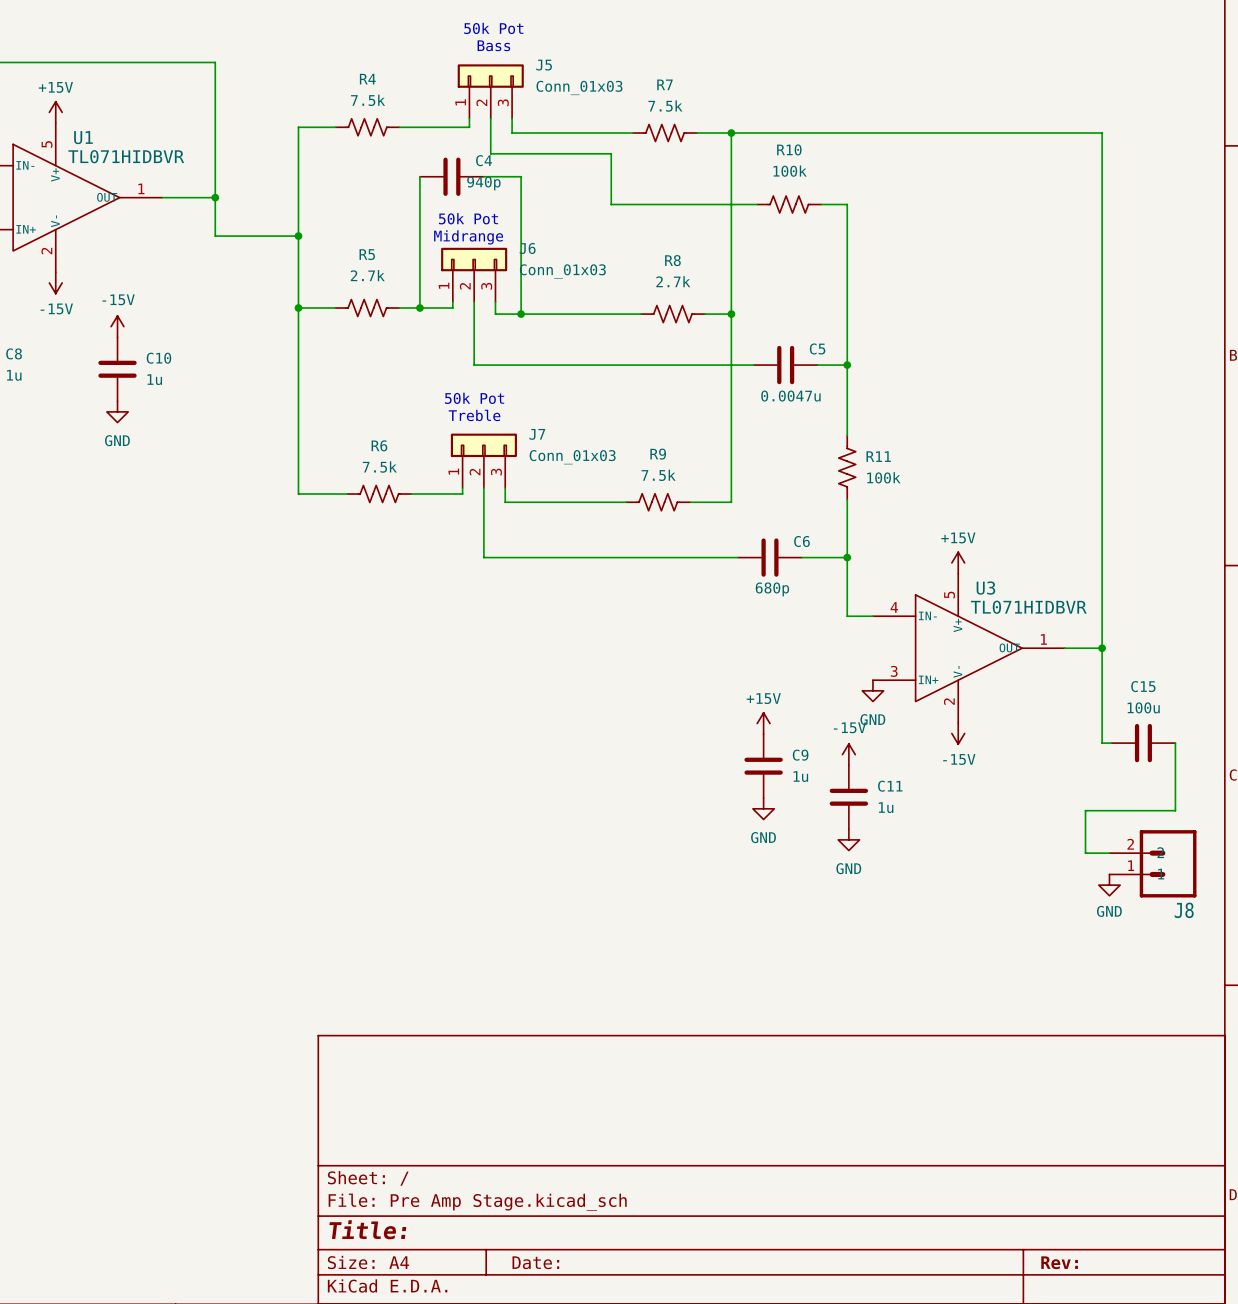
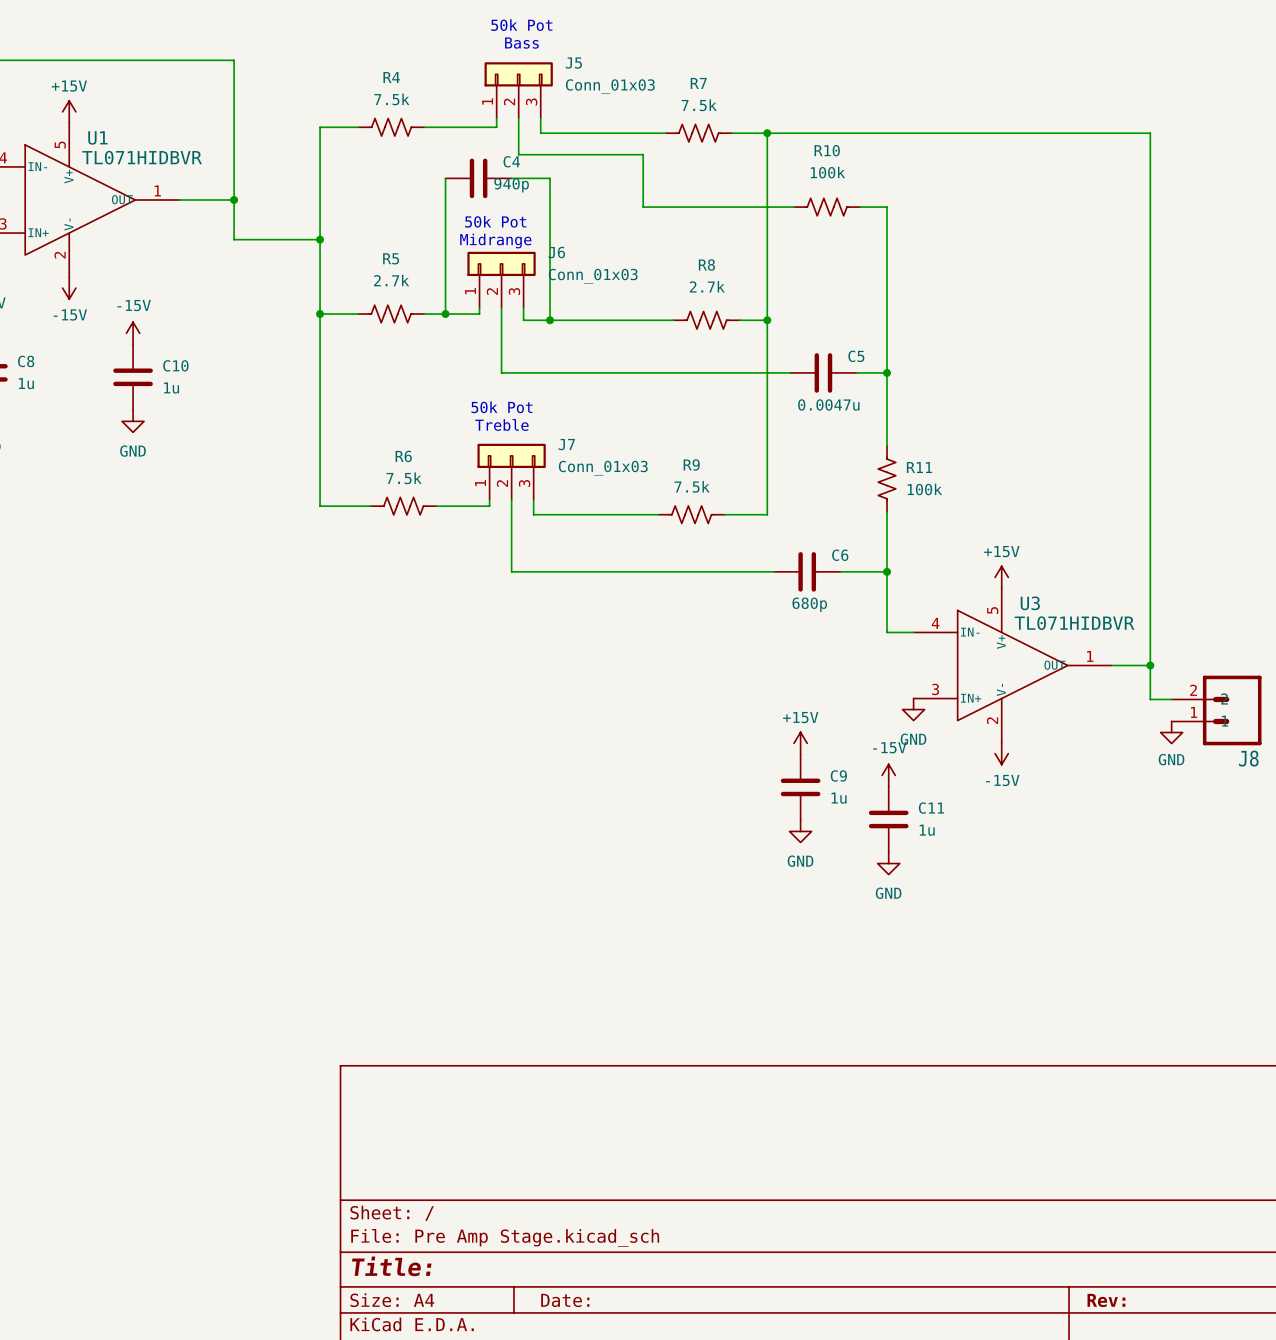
wire: (1102, 681) (1102, 743) (1111, 743) -> (1150, 699) (1171, 699)
C15: 100u (1143, 743) -> none
wire: (1175, 743) (1175, 810) (1085, 810) (1085, 853) (1109, 853) -> none
J8 position: (1152, 863) -> (1216, 710)
power symbol position: GND (1109, 885) -> GND (1171, 732)

